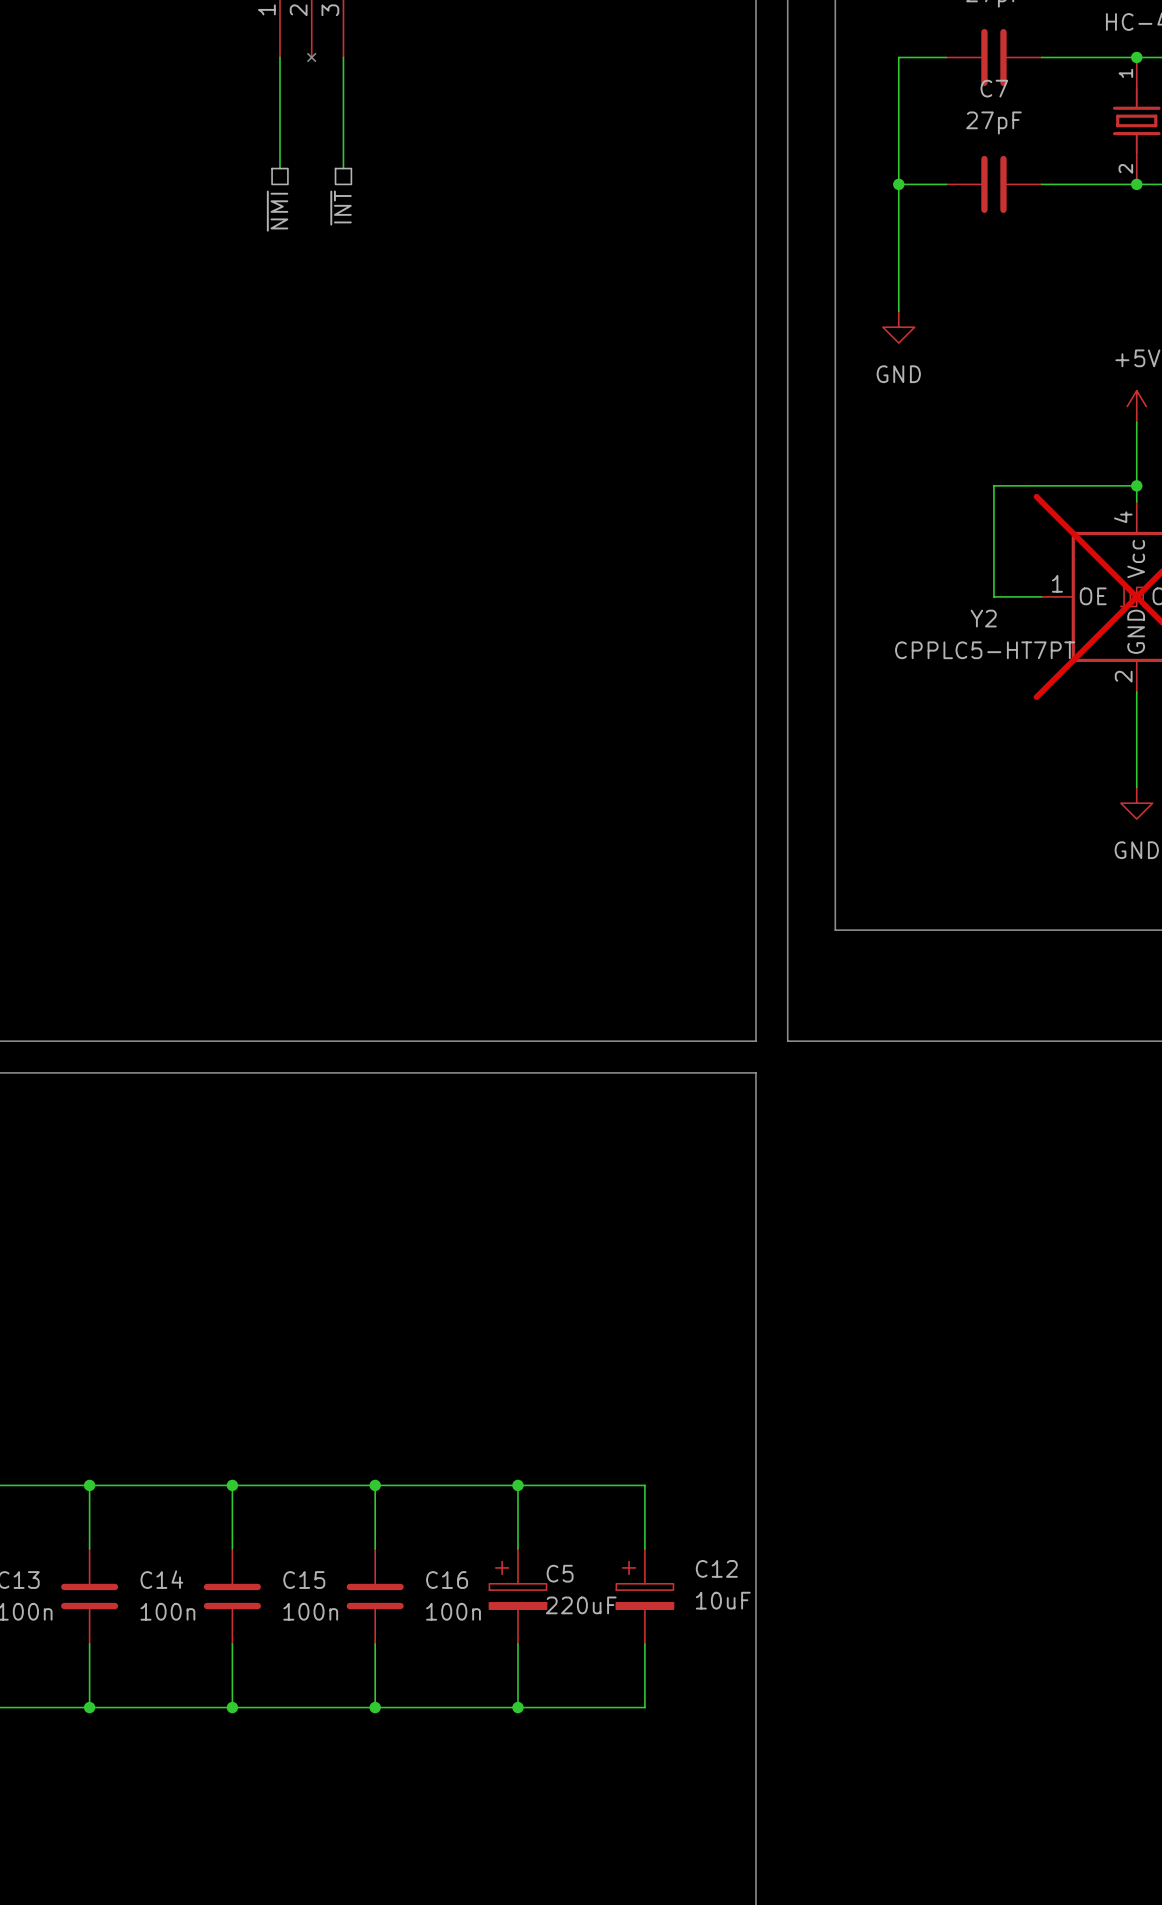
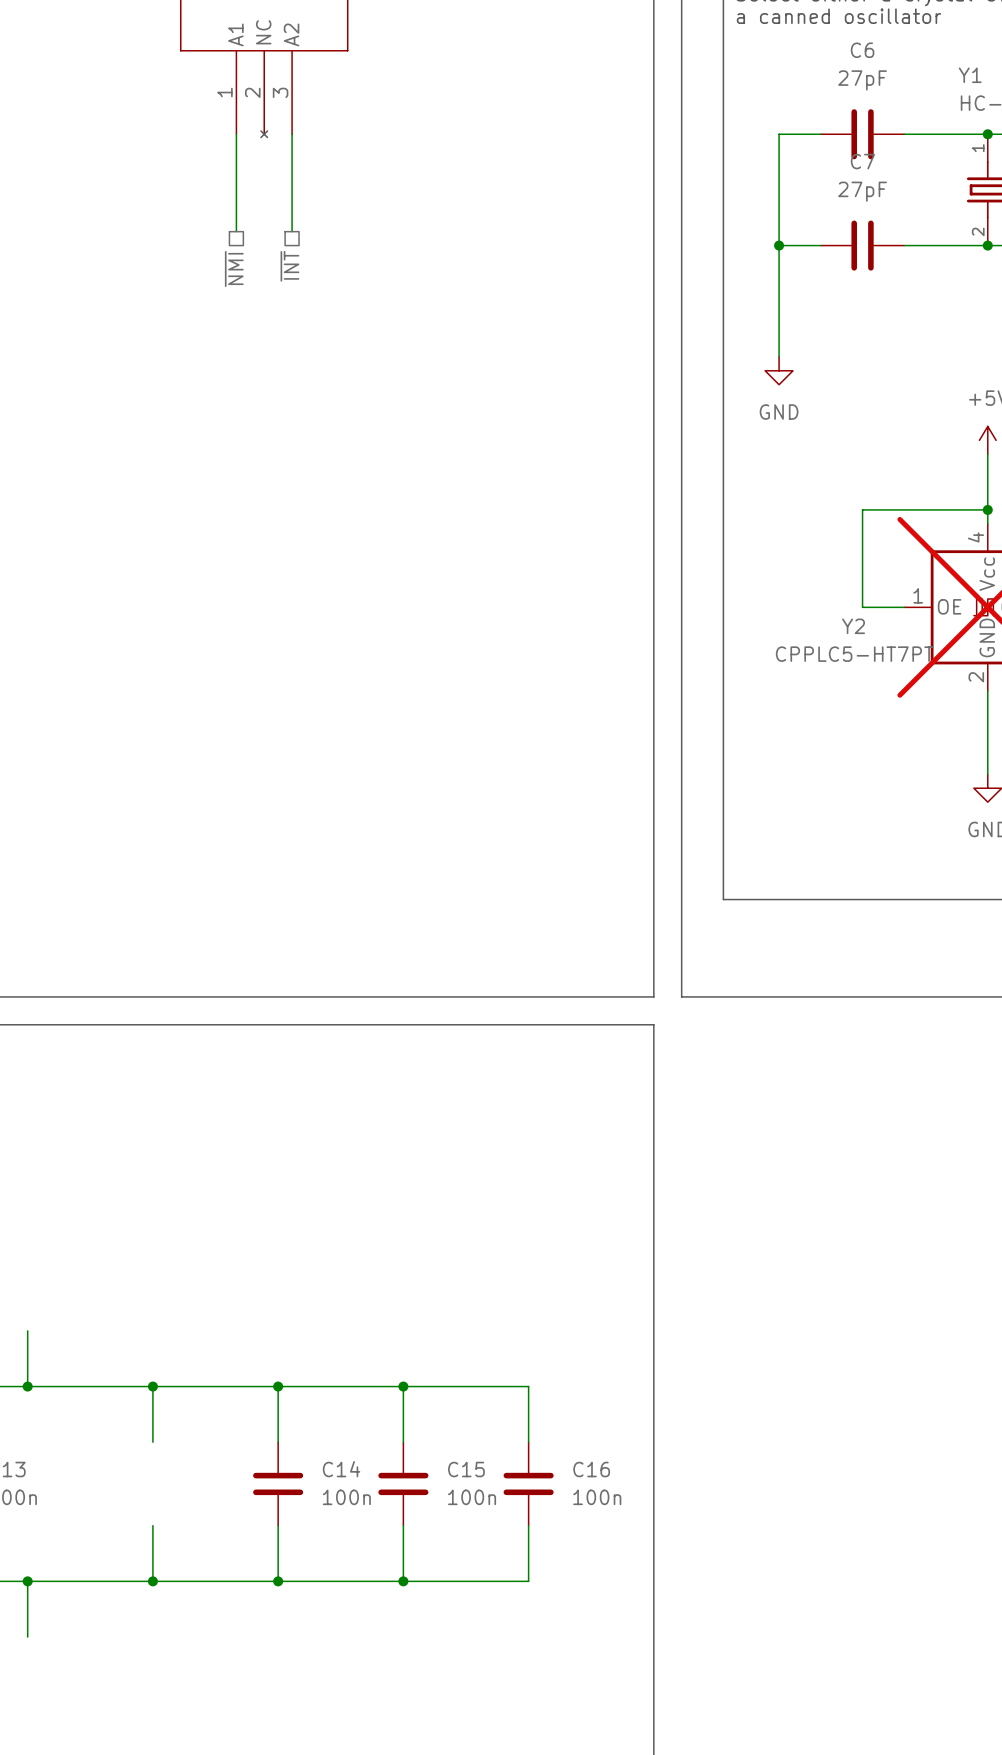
wire: none -> (27, 1330) (27, 1386)
junction: none -> (27, 1386)
wire: (89, 1485) (89, 1548) -> (152, 1386) (152, 1442)
junction: (89, 1485) -> none
junction: none -> (152, 1386)
wire: (232, 1485) (232, 1548) -> (278, 1386) (278, 1442)
junction: (232, 1485) -> none
junction: none -> (278, 1386)
wire: (375, 1485) (375, 1548) -> (403, 1386) (403, 1442)
junction: (375, 1485) -> none
junction: none -> (403, 1386)
wire: (517, 1485) (517, 1548) -> none
junction: (517, 1485) -> none
wire: (613, 1485) (644, 1485) (644, 1548) -> (528, 1386) (528, 1442)
C14 position: (89, 1596) -> (278, 1483)
C15 position: (232, 1596) -> (403, 1483)
C16 position: (375, 1596) -> (528, 1483)
C5: 220uF (517, 1596) -> none
C12: 10uF (644, 1596) -> none
wire: (89, 1644) (89, 1707) -> (152, 1525) (152, 1581)
wire: (232, 1644) (232, 1707) -> (278, 1525) (278, 1581)
wire: (375, 1644) (375, 1707) -> (403, 1525) (403, 1581)
wire: (517, 1644) (517, 1707) -> none
wire: (644, 1644) (644, 1707) (613, 1707) -> (528, 1525) (528, 1581)
wire: none -> (27, 1581) (27, 1637)
junction: none -> (27, 1581)
junction: (89, 1707) -> none
junction: none -> (152, 1581)
junction: (232, 1707) -> none
junction: none -> (278, 1581)
junction: (375, 1707) -> none
junction: none -> (403, 1581)
junction: (517, 1707) -> none

